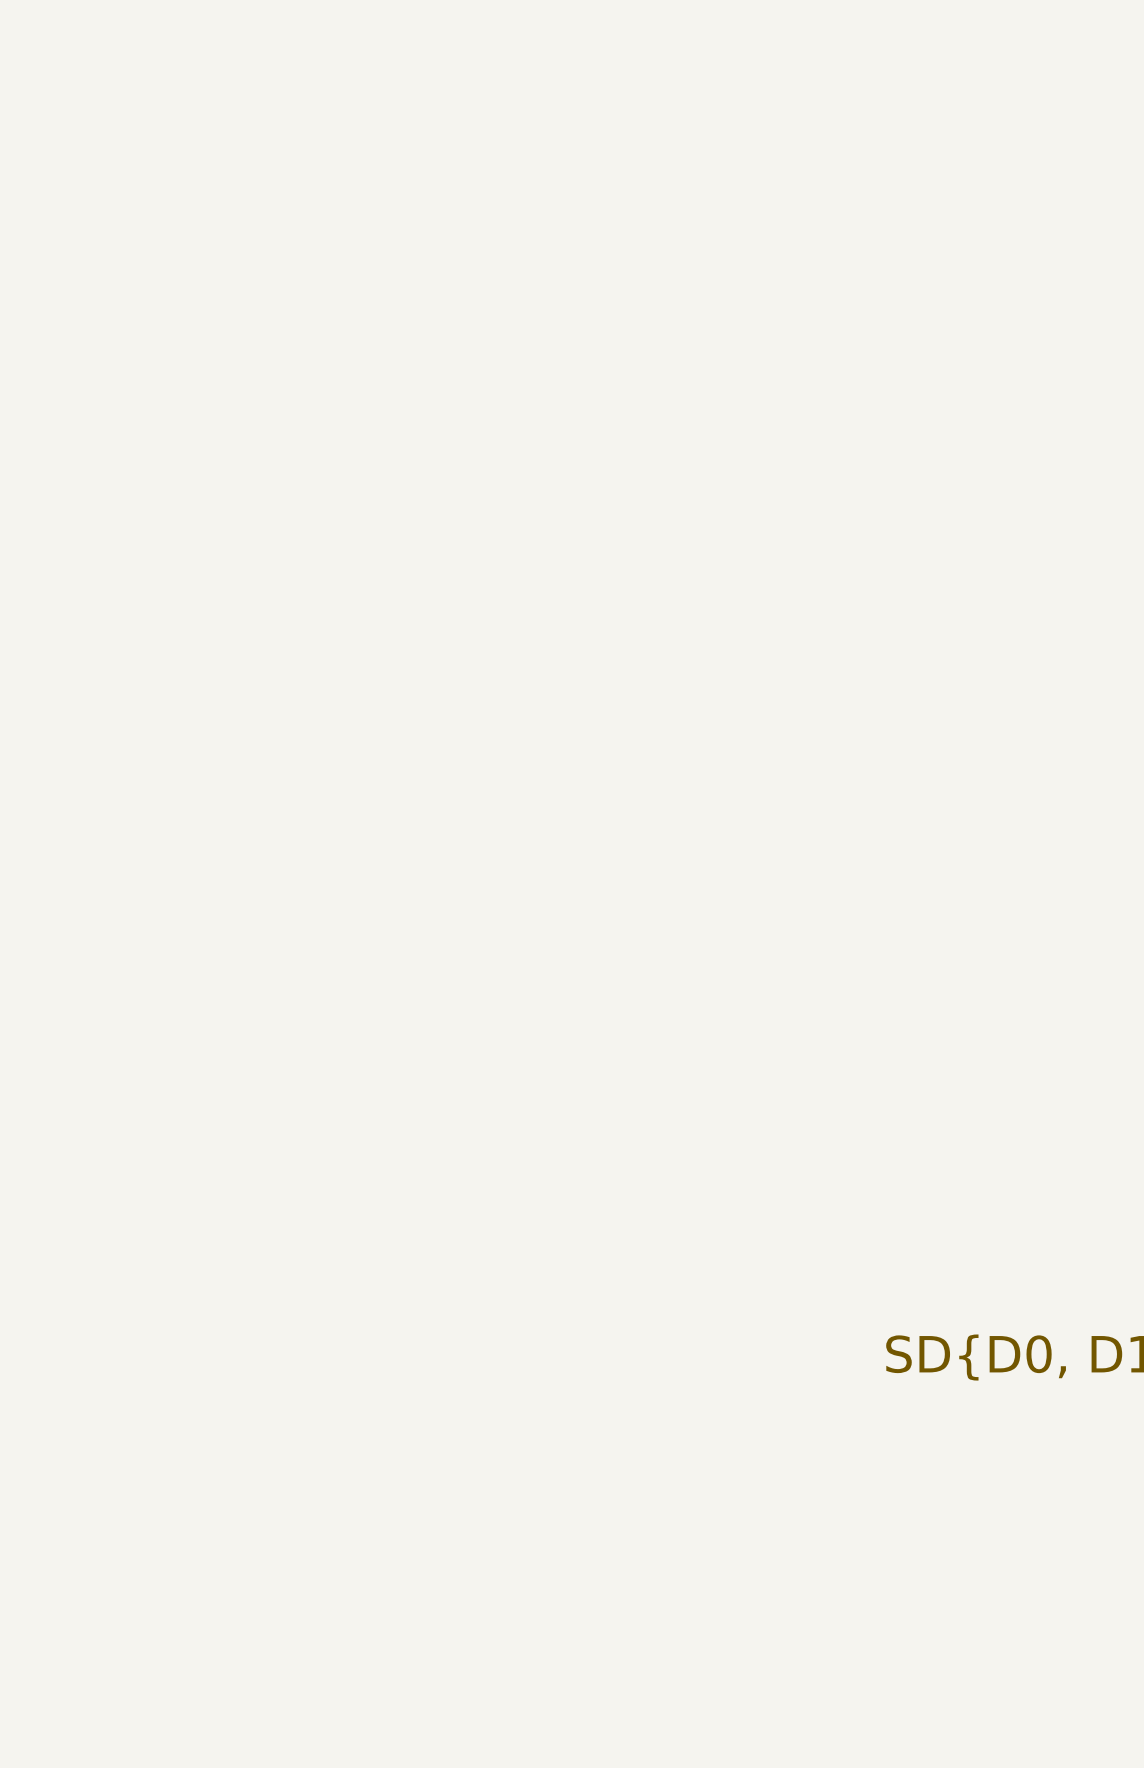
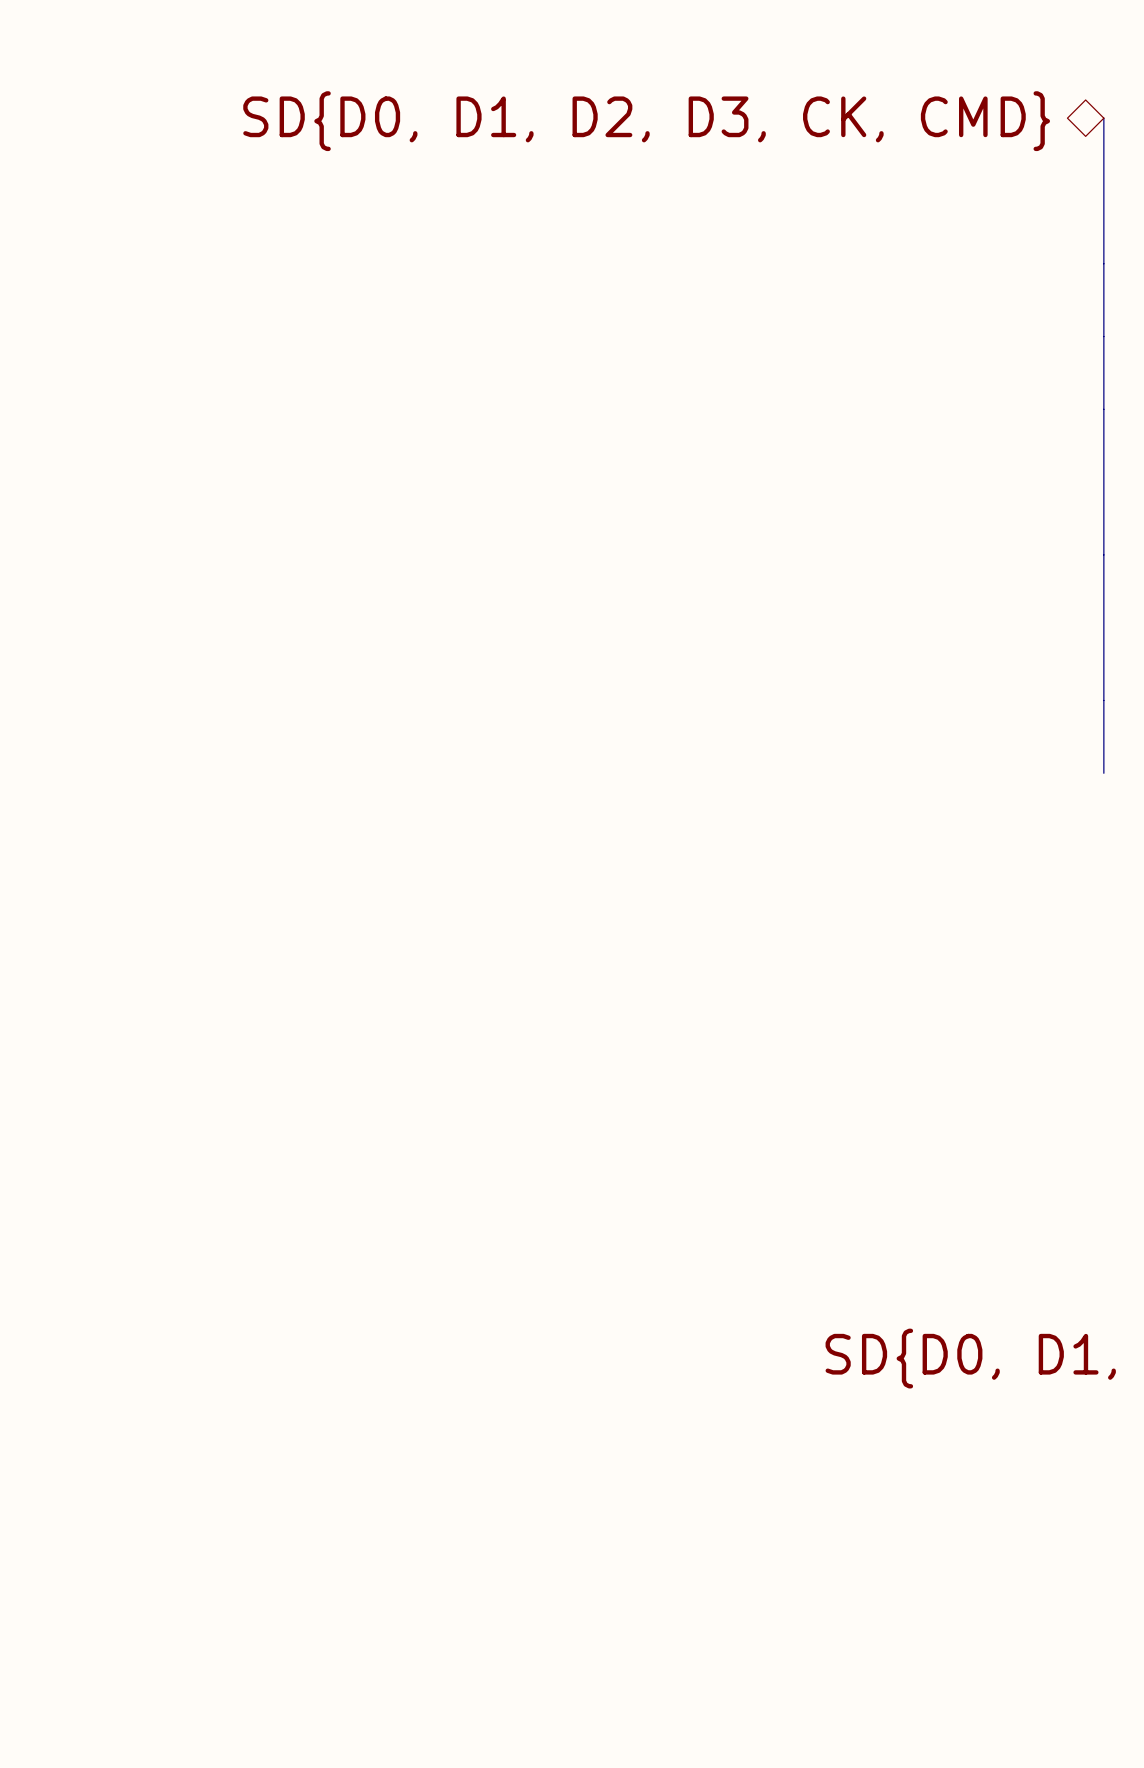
bus: none -> (1103, 118) (1103, 773)
hierarchical label: none -> SD{D0, D1, D2, D3, CK, CMD} (646, 121)

